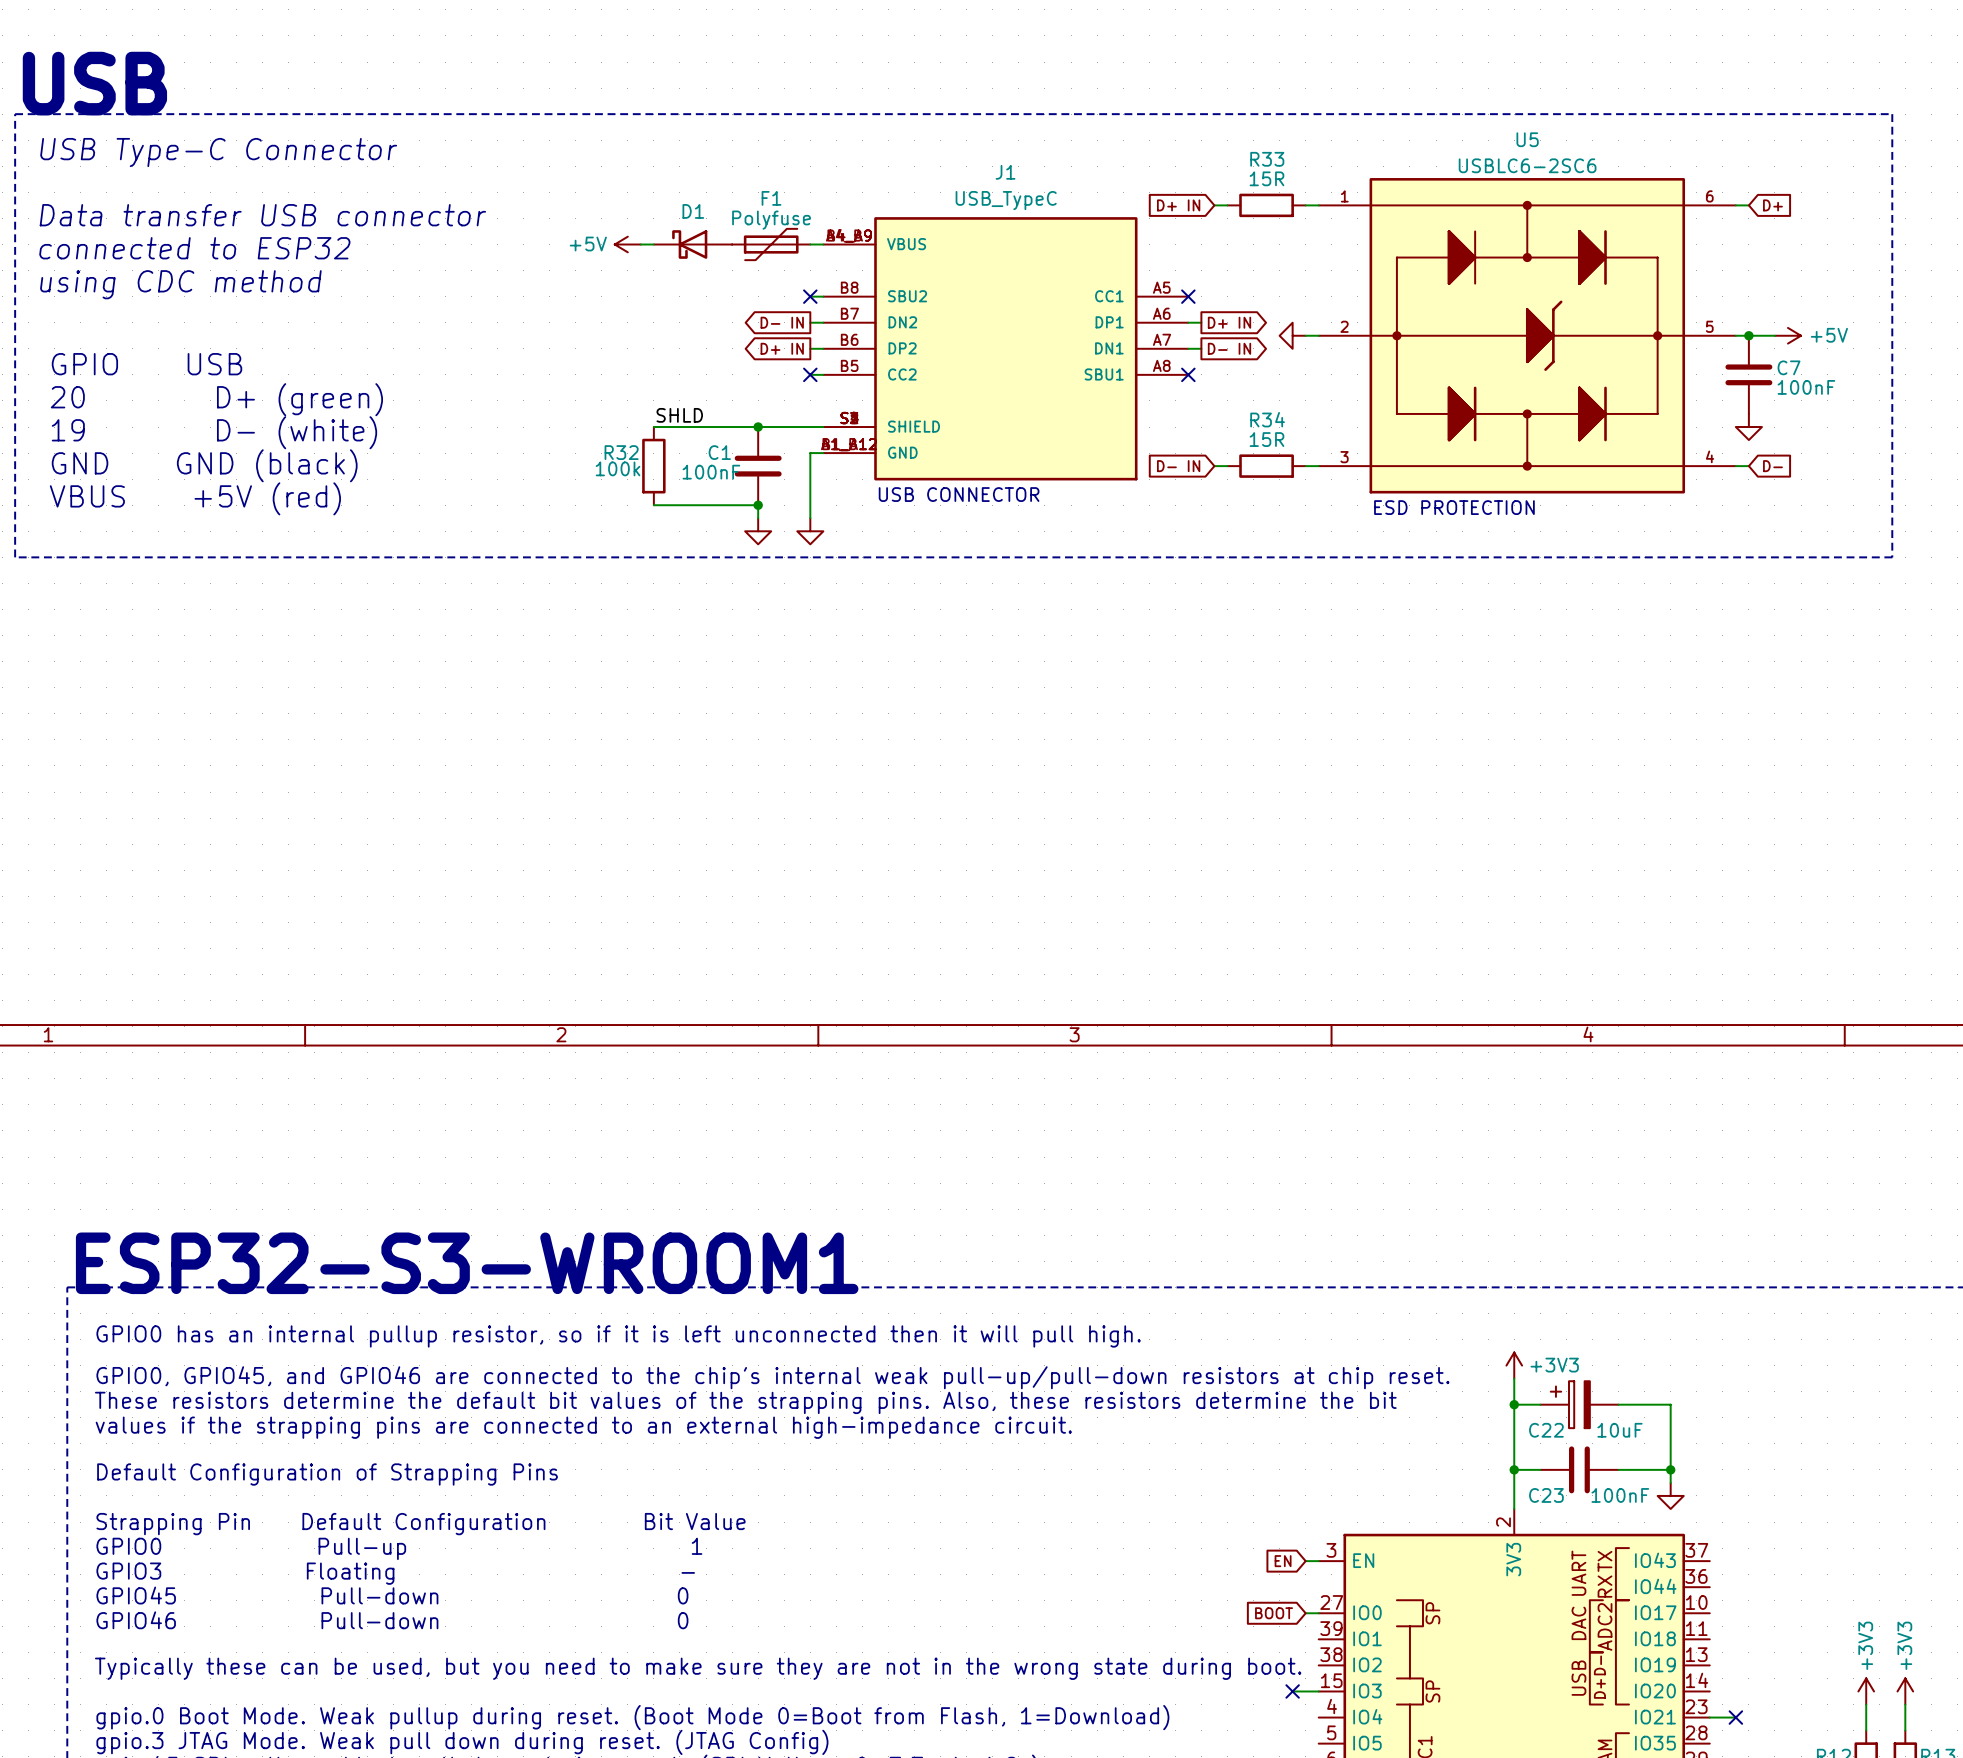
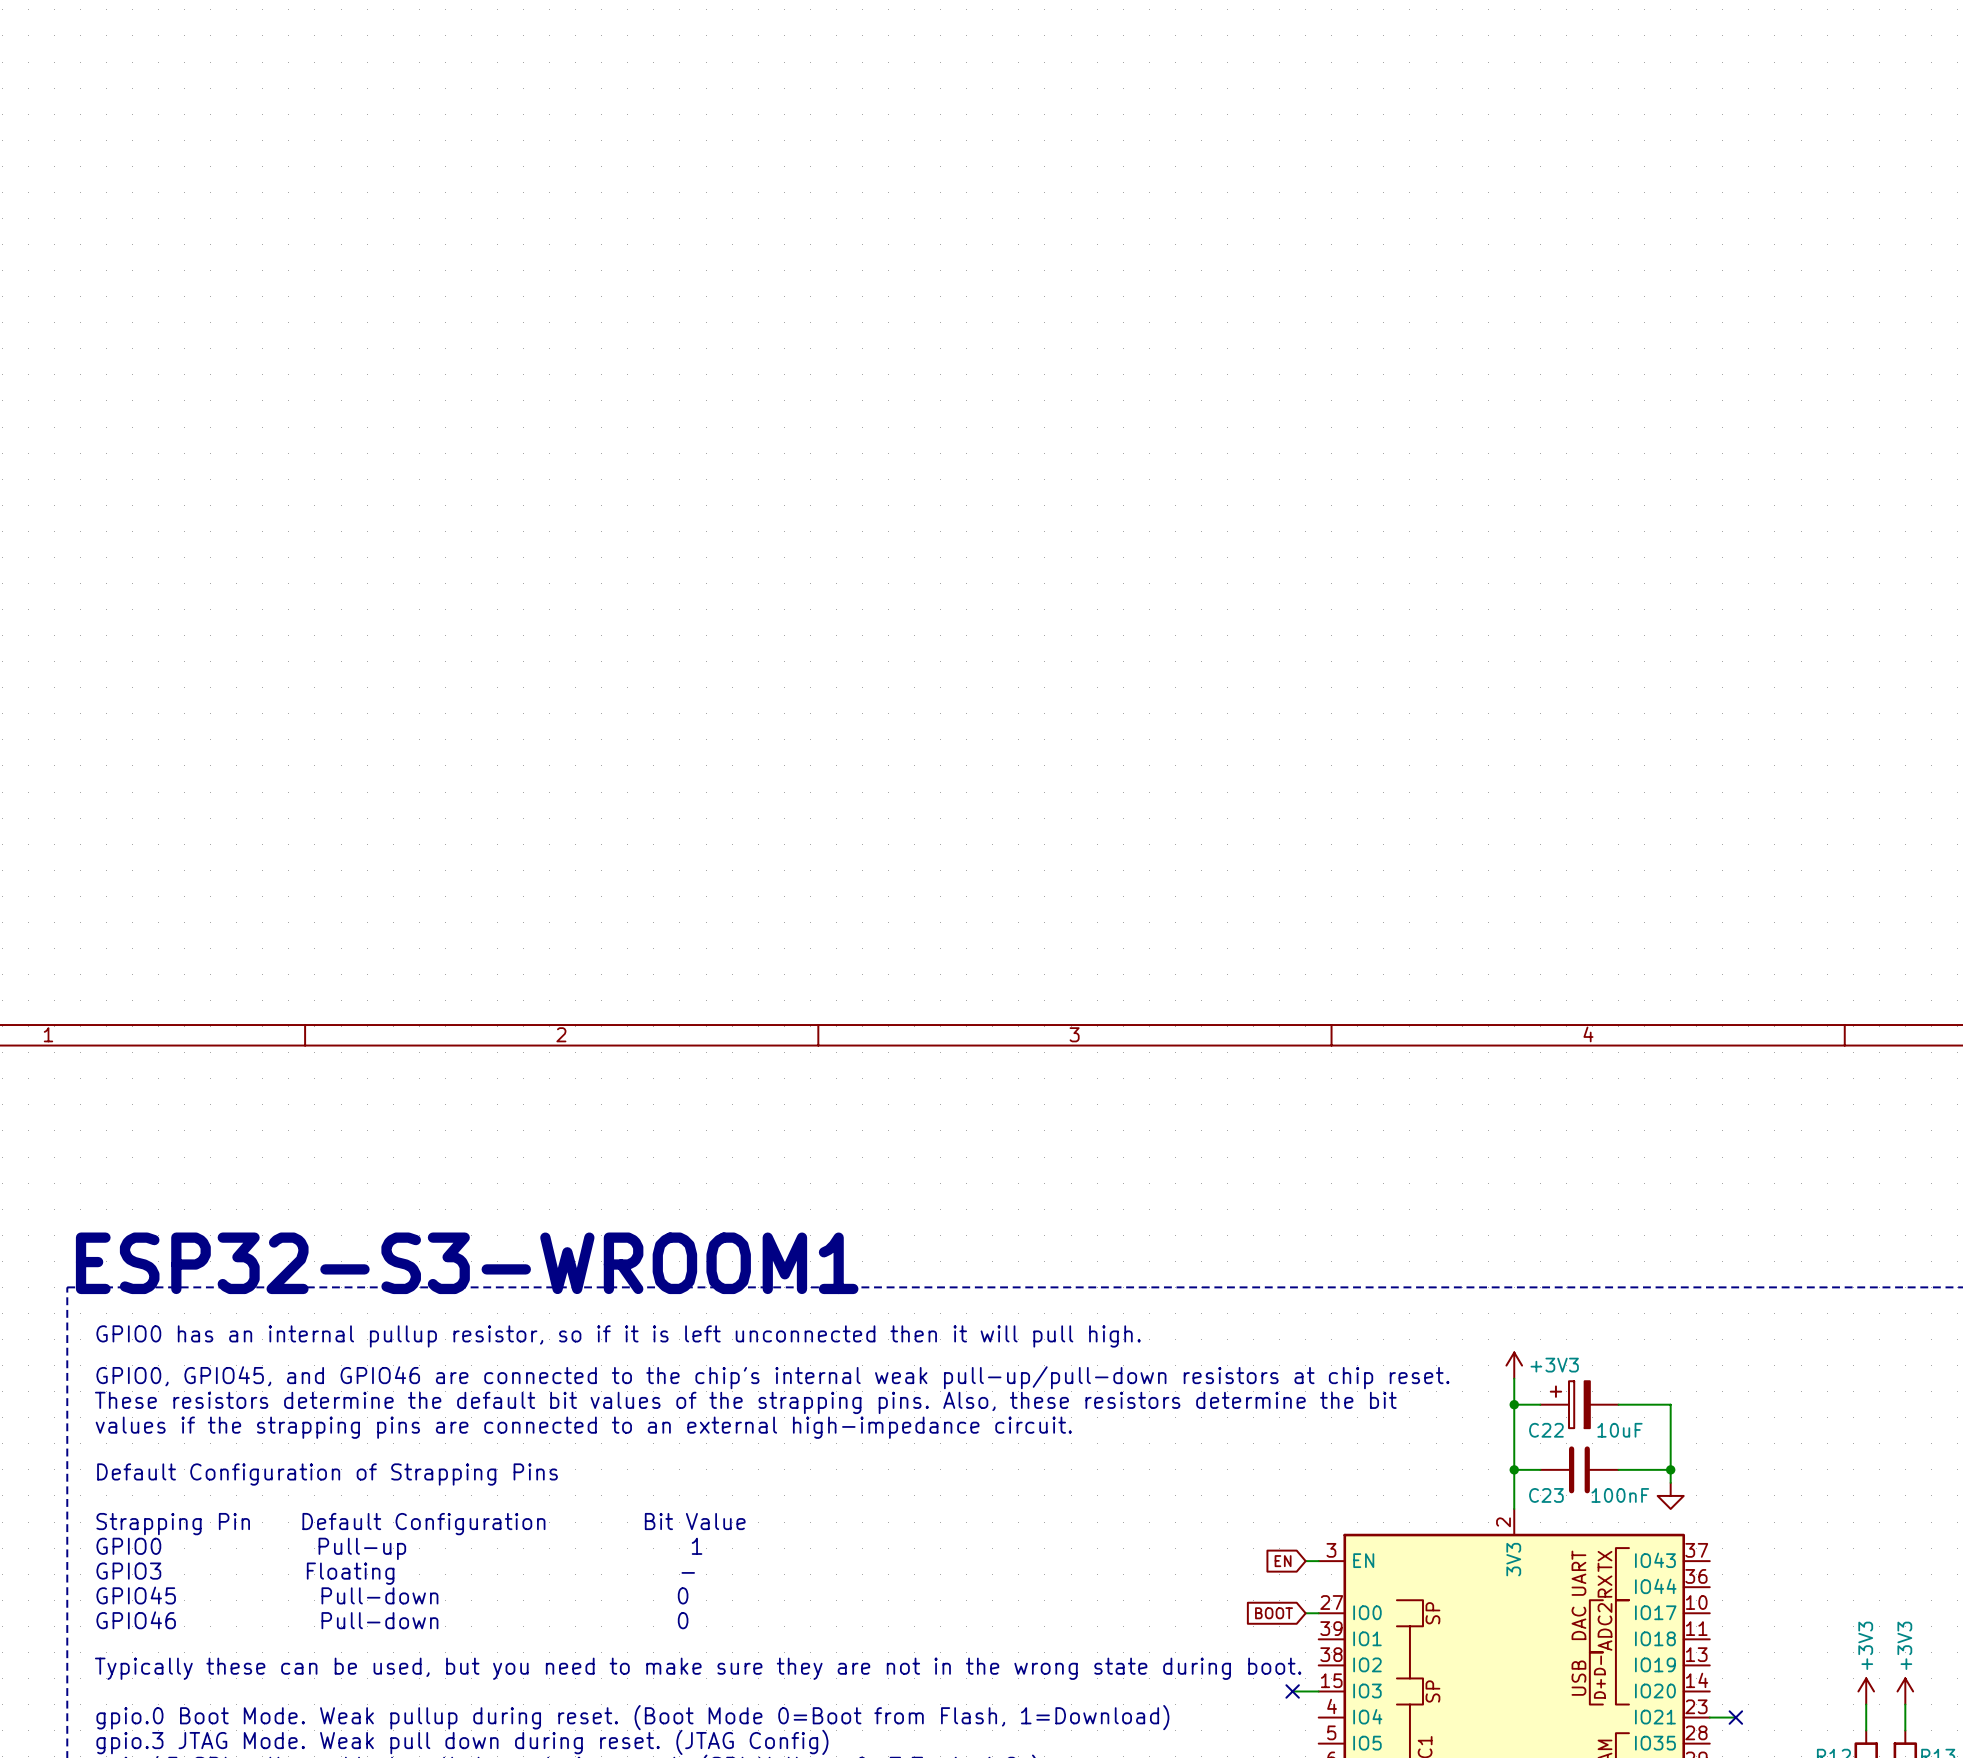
text: USB (94, 83) -> none
line: (15, 114) (1892, 114) (1892, 557) (15, 557) (15, 114) -> none
text: USB Type-C Connector (218, 152) -> none
global label: D+ IN (1178, 205) -> none
wire: (1214, 205) (1227, 205) -> none
R33: 15R (1266, 205) -> none
wire: (1305, 205) (1318, 205) -> none
wire: (1735, 205) (1748, 205) -> none
global label: D+ (1772, 205) -> none
text: Data transfer USB connector (262, 215) -> none
power symbol: +5V (627, 244) -> none
wire: (640, 244) (653, 244) -> none
D1: (692, 244) -> none
F1: Polyfuse (771, 244) -> none
wire: (810, 244) (823, 244) -> none
text: connected to ESP32 (194, 248) -> none
text: using CDC method (180, 284) -> none
wire: (810, 296) (823, 296) -> none
no-connect mark: (810, 296) -> none
no-connect mark: (1188, 296) -> none
global label: D- IN (782, 322) -> none
wire: (810, 322) (823, 322) -> none
wire: (1188, 322) (1201, 322) -> none
global label: D+ IN (1229, 322) -> none
power symbol: (1292, 335) -> none
wire: (1305, 335) (1318, 335) -> none
U5: USBLC6-2SC6 (1527, 335) -> none
wire: (1735, 335) (1774, 335) -> none
junction: (1748, 335) -> none
power symbol: +5V (1788, 335) -> none
global label: D+ IN (782, 348) -> none
wire: (810, 348) (823, 348) -> none
J1: USB_TypeC (1005, 348) -> none
wire: (1188, 348) (1201, 348) -> none
global label: D- IN (1229, 348) -> none
text: GPIO USB (146, 364) -> none
wire: (810, 374) (823, 374) -> none
no-connect mark: (810, 374) -> none
no-connect mark: (1188, 374) -> none
C7: 100nF (1748, 374) -> none
text: 20 D+ (green) (216, 399) -> none
label: SHLD (679, 415) -> none
wire: (653, 427) (823, 427) -> none
junction: (758, 427) -> none
power symbol: (1748, 427) -> none
text: 19 D- (white) (214, 432) -> none
wire: (823, 453) (810, 453) (810, 518) -> none
text: GND GND (black) (204, 465) -> none
R32: 100k (653, 466) -> none
C1: 100nF (758, 466) -> none
global label: D- IN (1178, 466) -> none
wire: (1214, 466) (1227, 466) -> none
R34: 15R (1266, 466) -> none
wire: (1305, 466) (1318, 466) -> none
wire: (1735, 466) (1748, 466) -> none
global label: D- (1772, 466) -> none
text: USB CONNECTOR (959, 494) -> none
text: VBUS +5V (red) (195, 498) -> none
wire: (653, 505) (758, 505) (758, 518) -> none
junction: (758, 505) -> none
text: ESD PROTECTION (1454, 507) -> none
power symbol: (758, 531) -> none
power symbol: (810, 531) -> none

